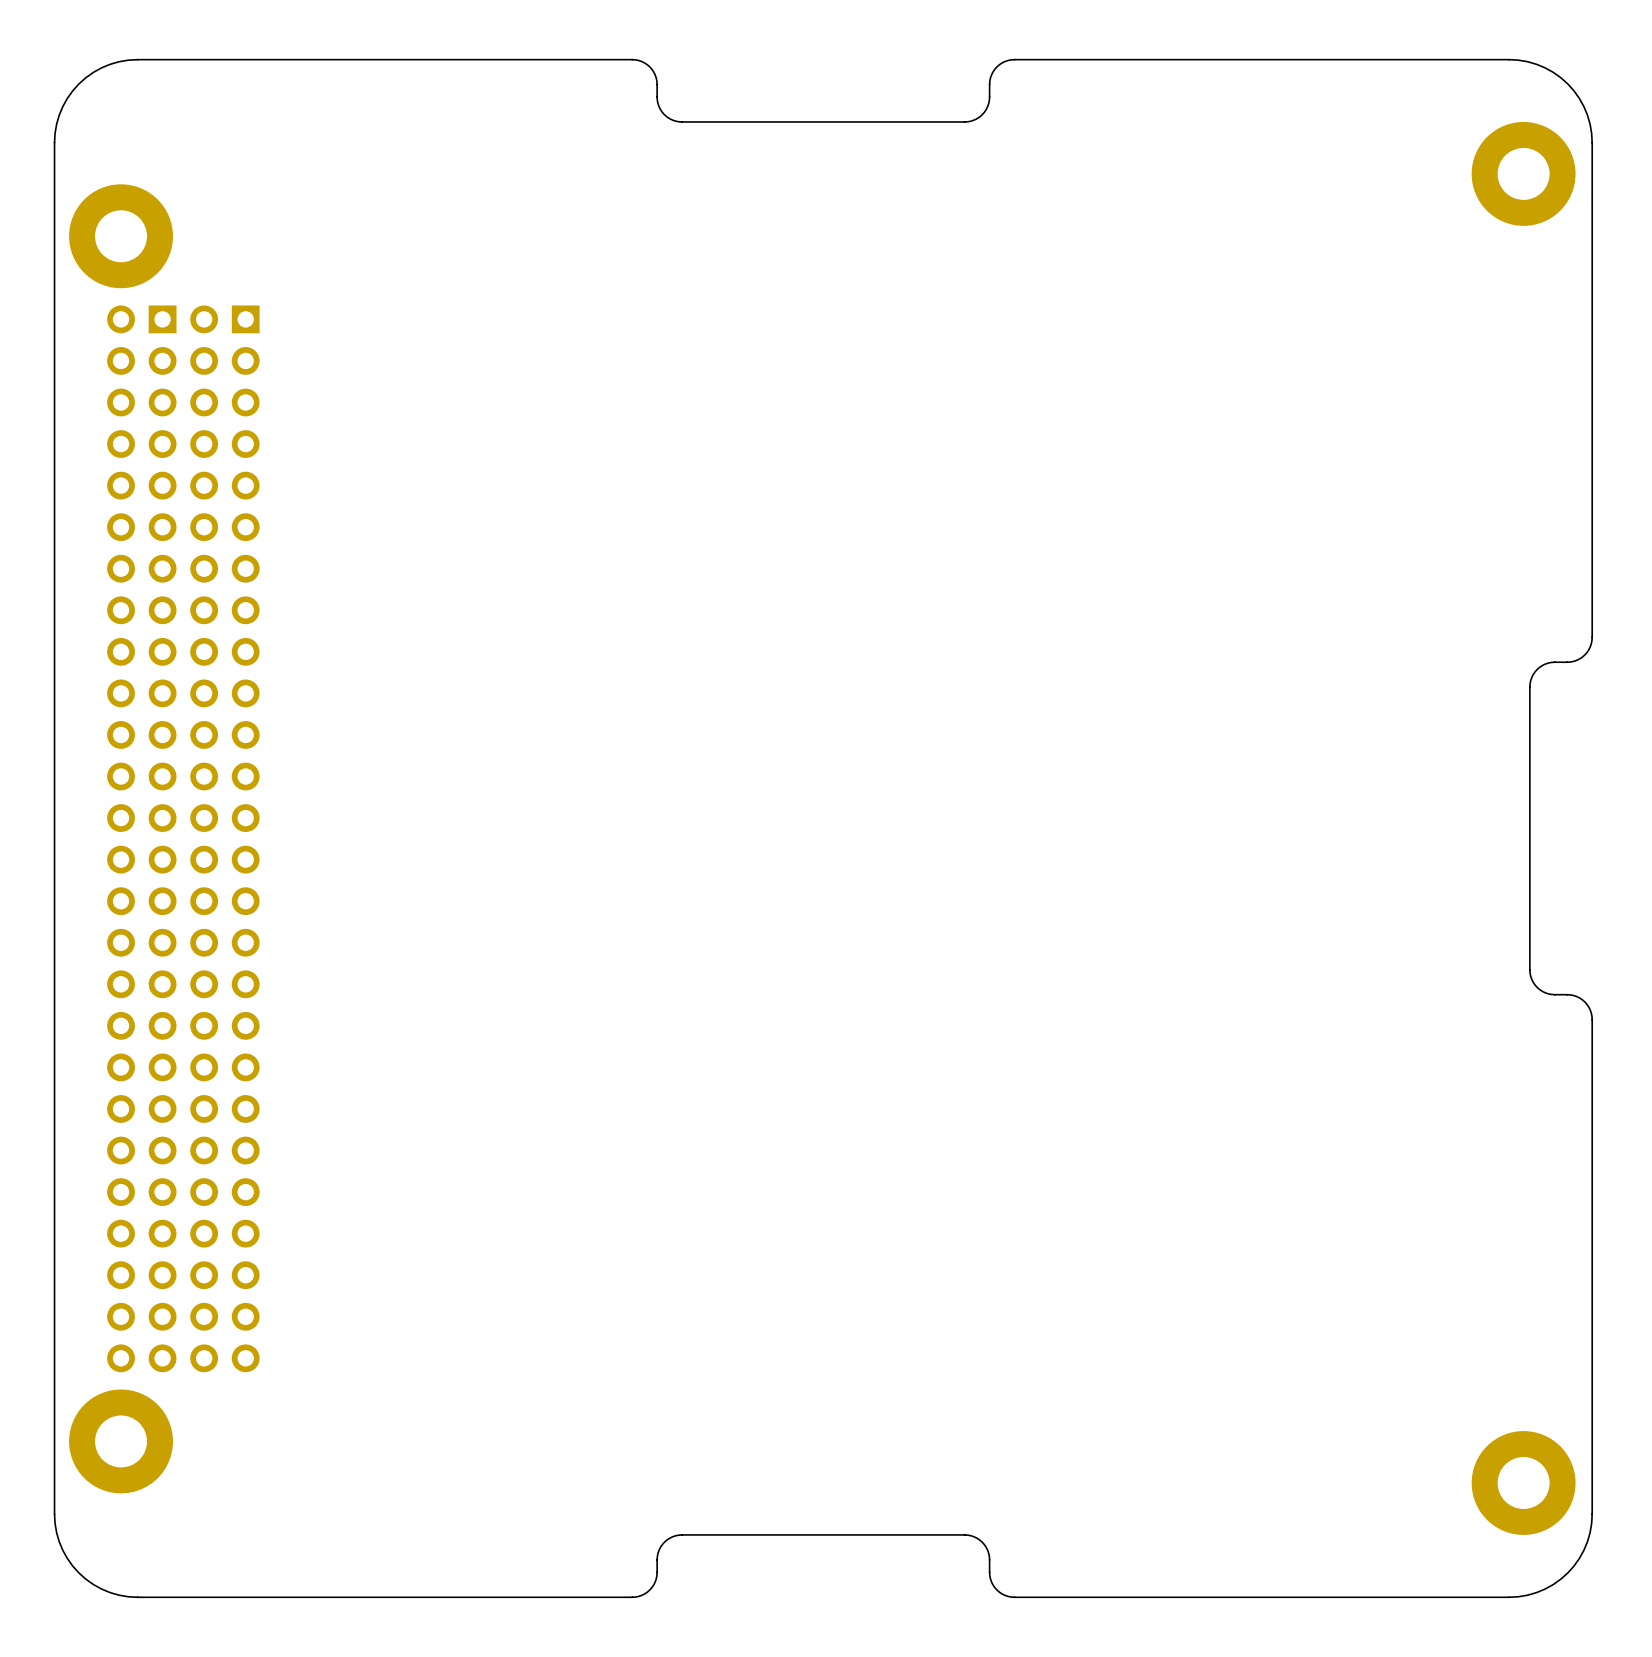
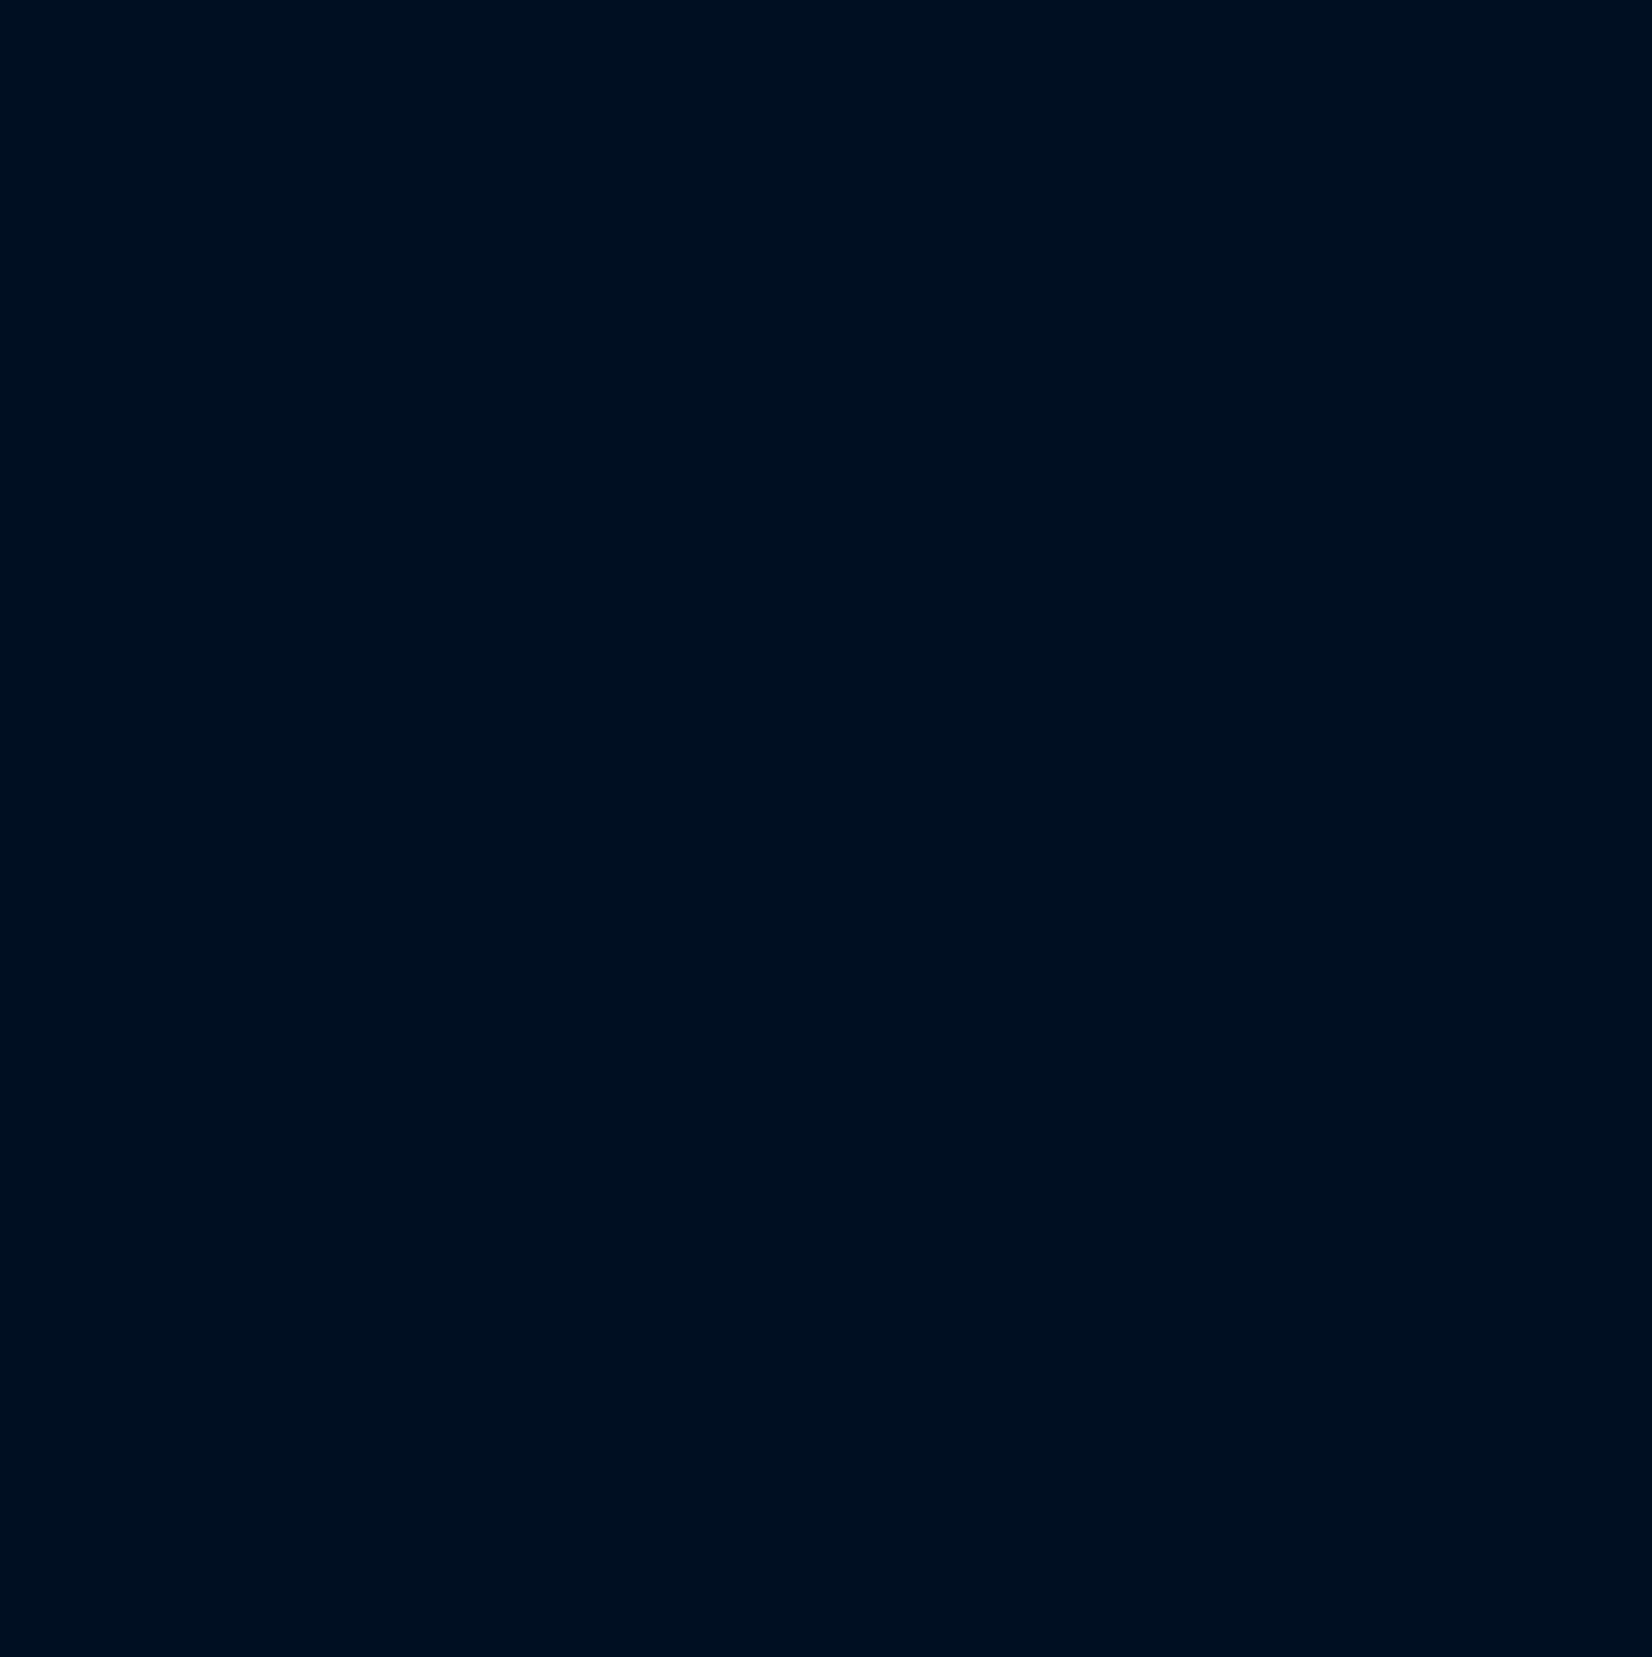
board edge: (1509, 59) (1011, 59) (999, 64) (992, 72) (989, 81) (988, 103) (984, 112) (974, 120) (964, 121) (678, 121) (666, 116) (660, 109) (657, 100) (656, 78) (651, 69) (641, 61) (632, 59) (137, 59) (119, 61) (101, 67) (78, 83) (62, 106) (56, 124) (54, 142) (54, 1514) (59, 1541) (67, 1558) (78, 1572) (93, 1584) (110, 1592) (137, 1597) (632, 1597) (641, 1595) (651, 1587) (656, 1578) (657, 1556) (660, 1547) (669, 1538) (682, 1534) (967, 1535) (979, 1540) (986, 1547) (989, 1556) (990, 1578) (994, 1587) (1004, 1595) (1014, 1597) (1509, 1597) (1536, 1592) (1553, 1584) (1567, 1572) (1583, 1550) (1590, 1532) (1592, 1514) (1592, 1019) (1590, 1010) (1582, 999) (1573, 995) (1551, 994) (1542, 991) (1533, 982) (1530, 973) (1529, 687) (1531, 677) (1539, 667) (1548, 663) (1570, 662) (1579, 658) (1588, 649) (1591, 640) (1592, 142) (1590, 124) (1583, 106) (1567, 83) (1545, 67) (1527, 61) (1509, 59) -> none
part: (1523, 173) -> none
part: (121, 236) -> none
part: (141, 838) -> none
part: (224, 838) -> none
part: (121, 1441) -> none
part: (1523, 1483) -> none

